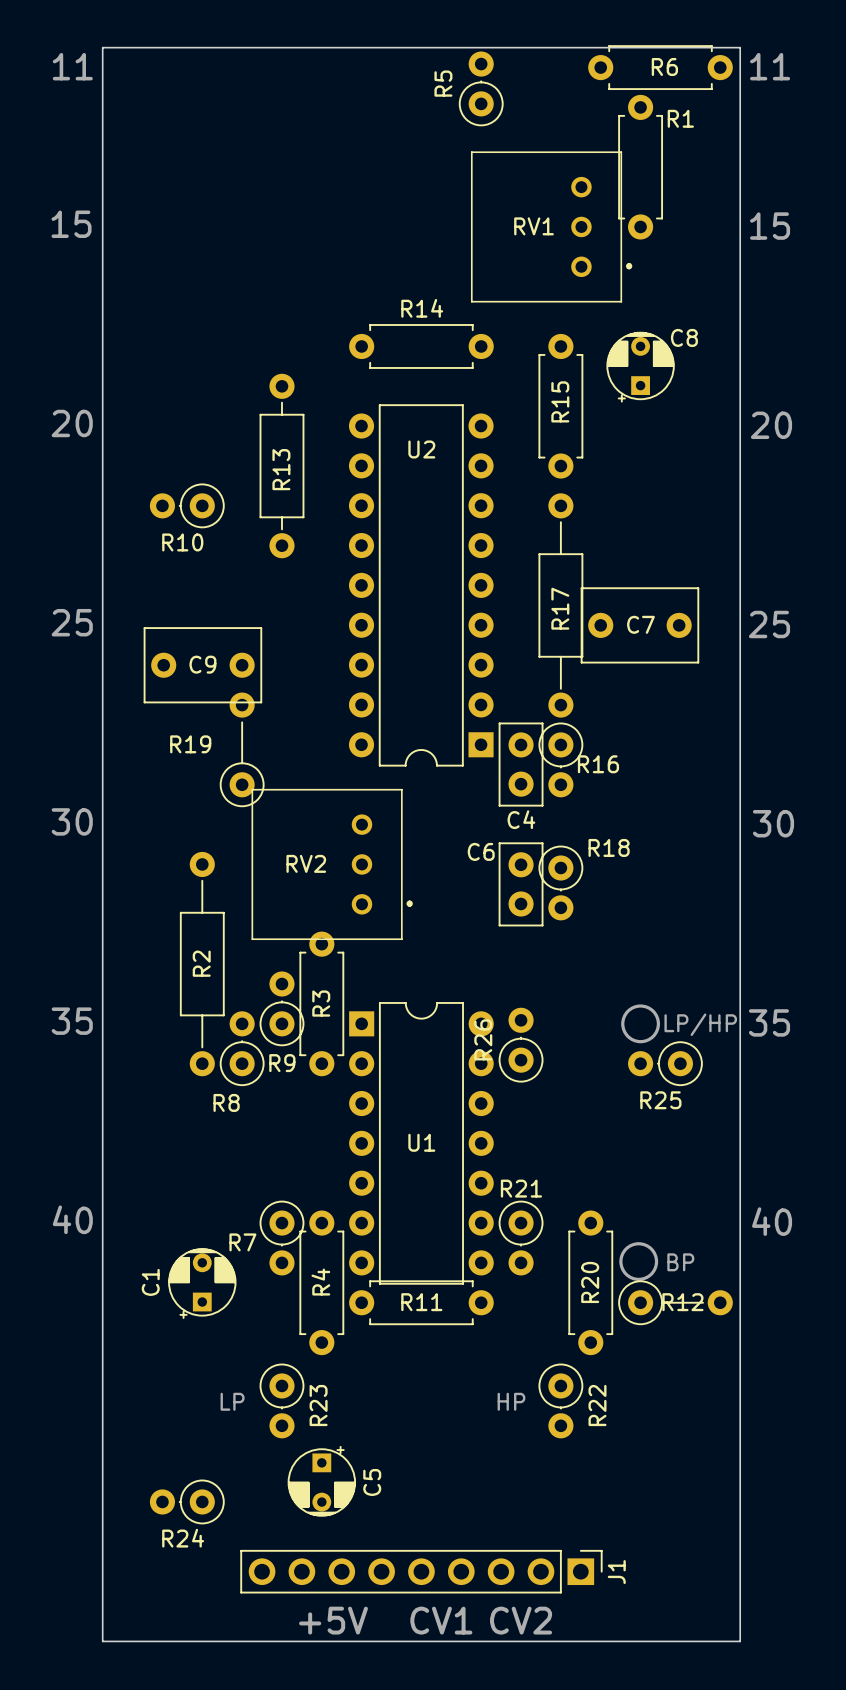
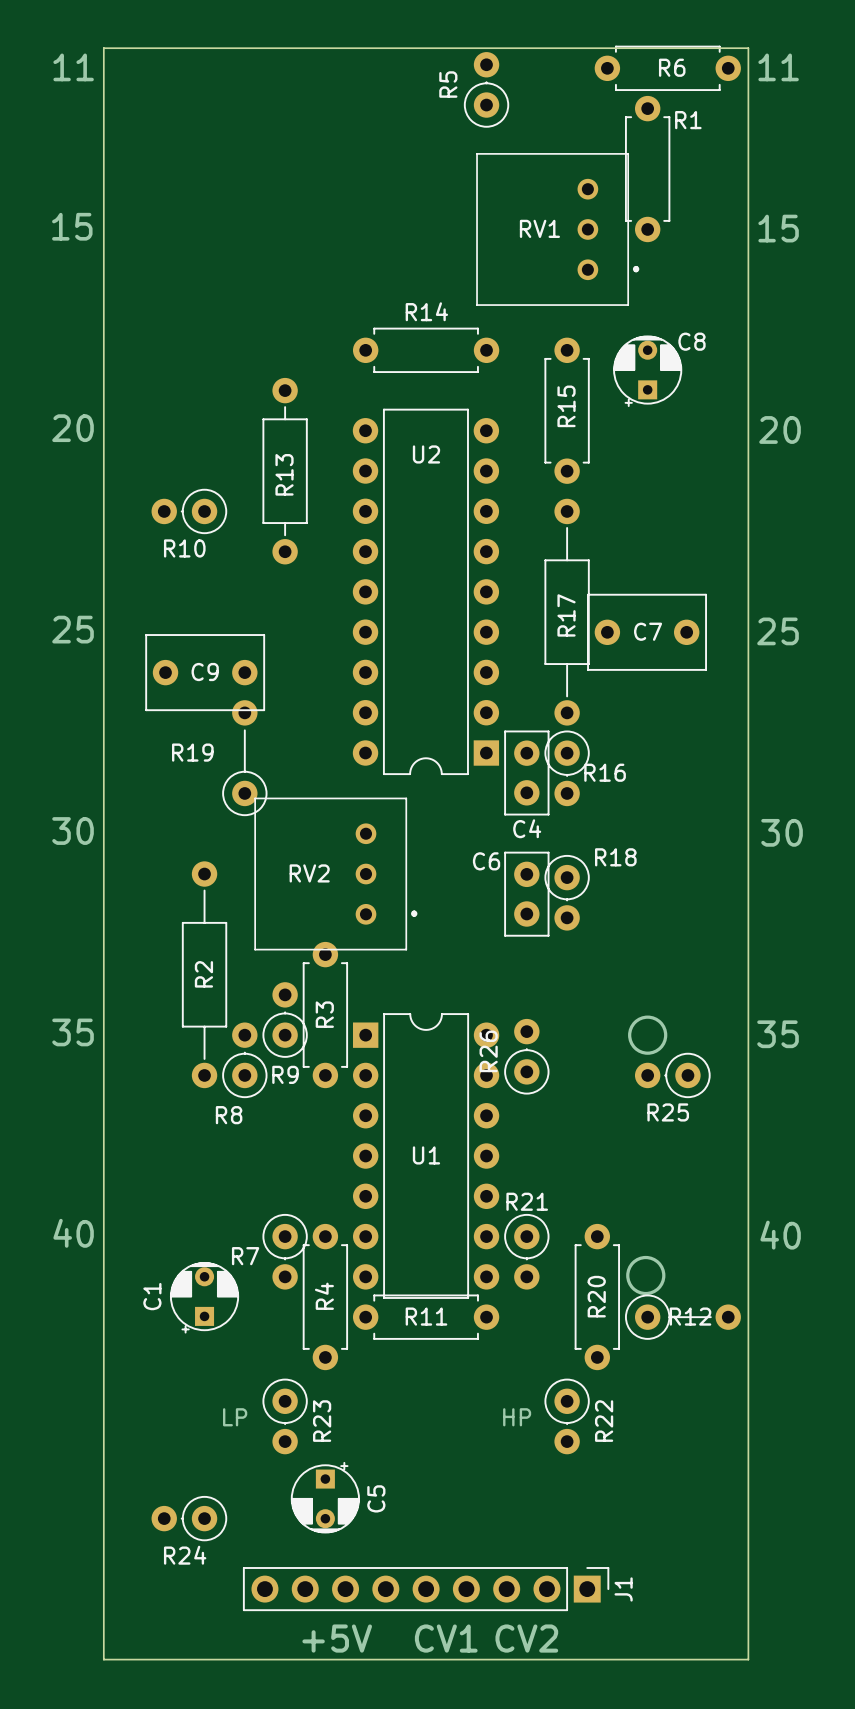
text: LP/HP (700, 1024) -> none
text: BP (680, 1262) -> none

